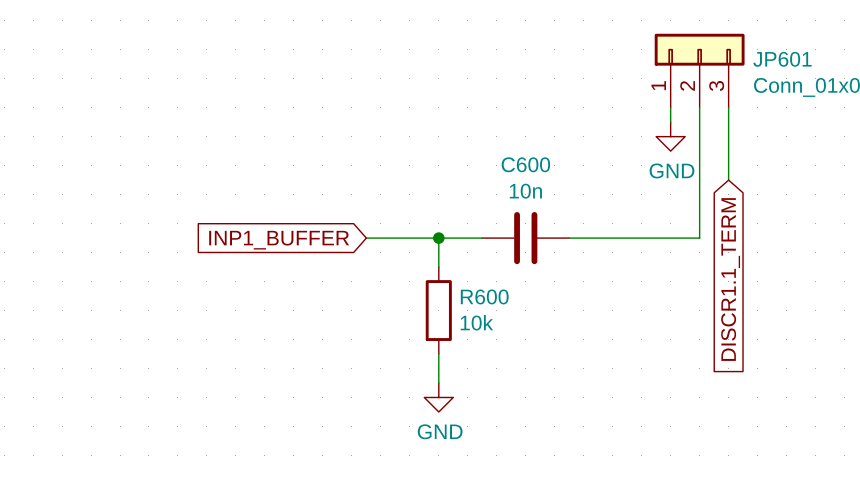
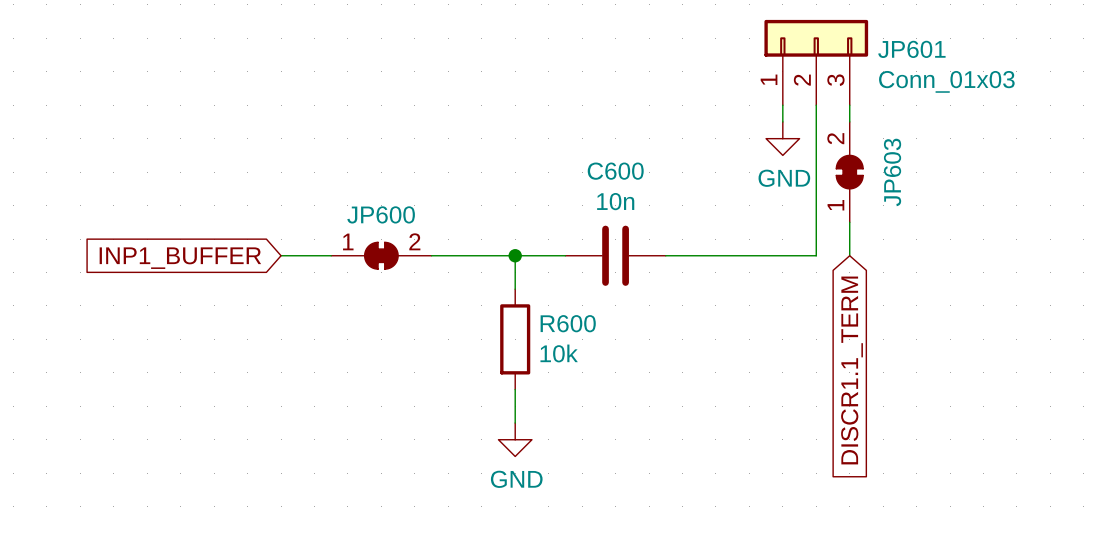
JP603: none -> (849, 172)
wire: none -> (281, 255) (331, 255)
JP600: none -> (381, 255)
global label position: INP1_BUFFER (279, 240) -> INP1_BUFFER (180, 258)
global label position: DISCR1.1_TERM (730, 279) -> DISCR1.1_TERM (852, 370)

